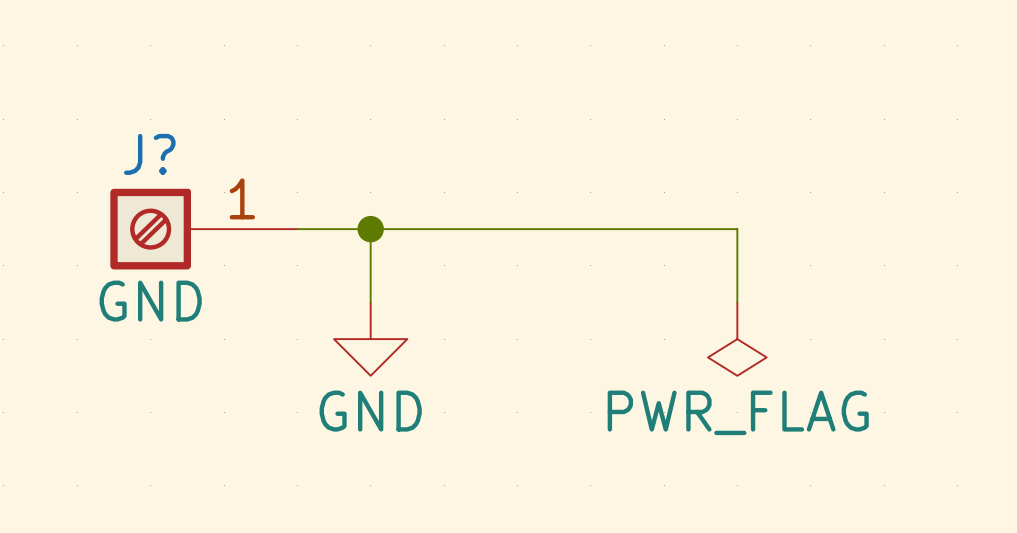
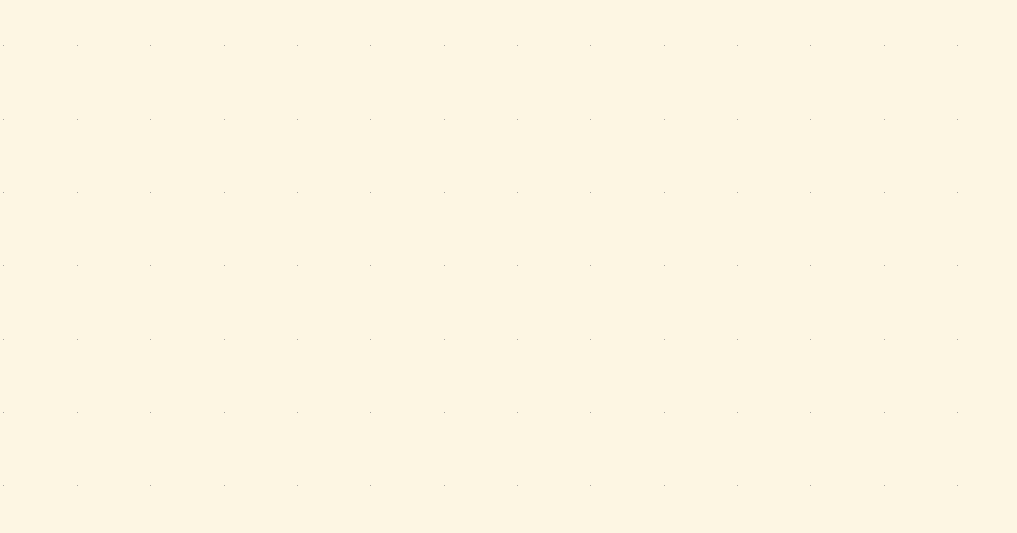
J?: GND (203, 229) -> none
wire: (297, 229) (737, 229) (737, 302) -> none
wire: (370, 229) (370, 302) -> none
junction: (370, 229) -> none
power symbol: GND (370, 339) -> none
power symbol: PWR_FLAG (737, 339) -> none

